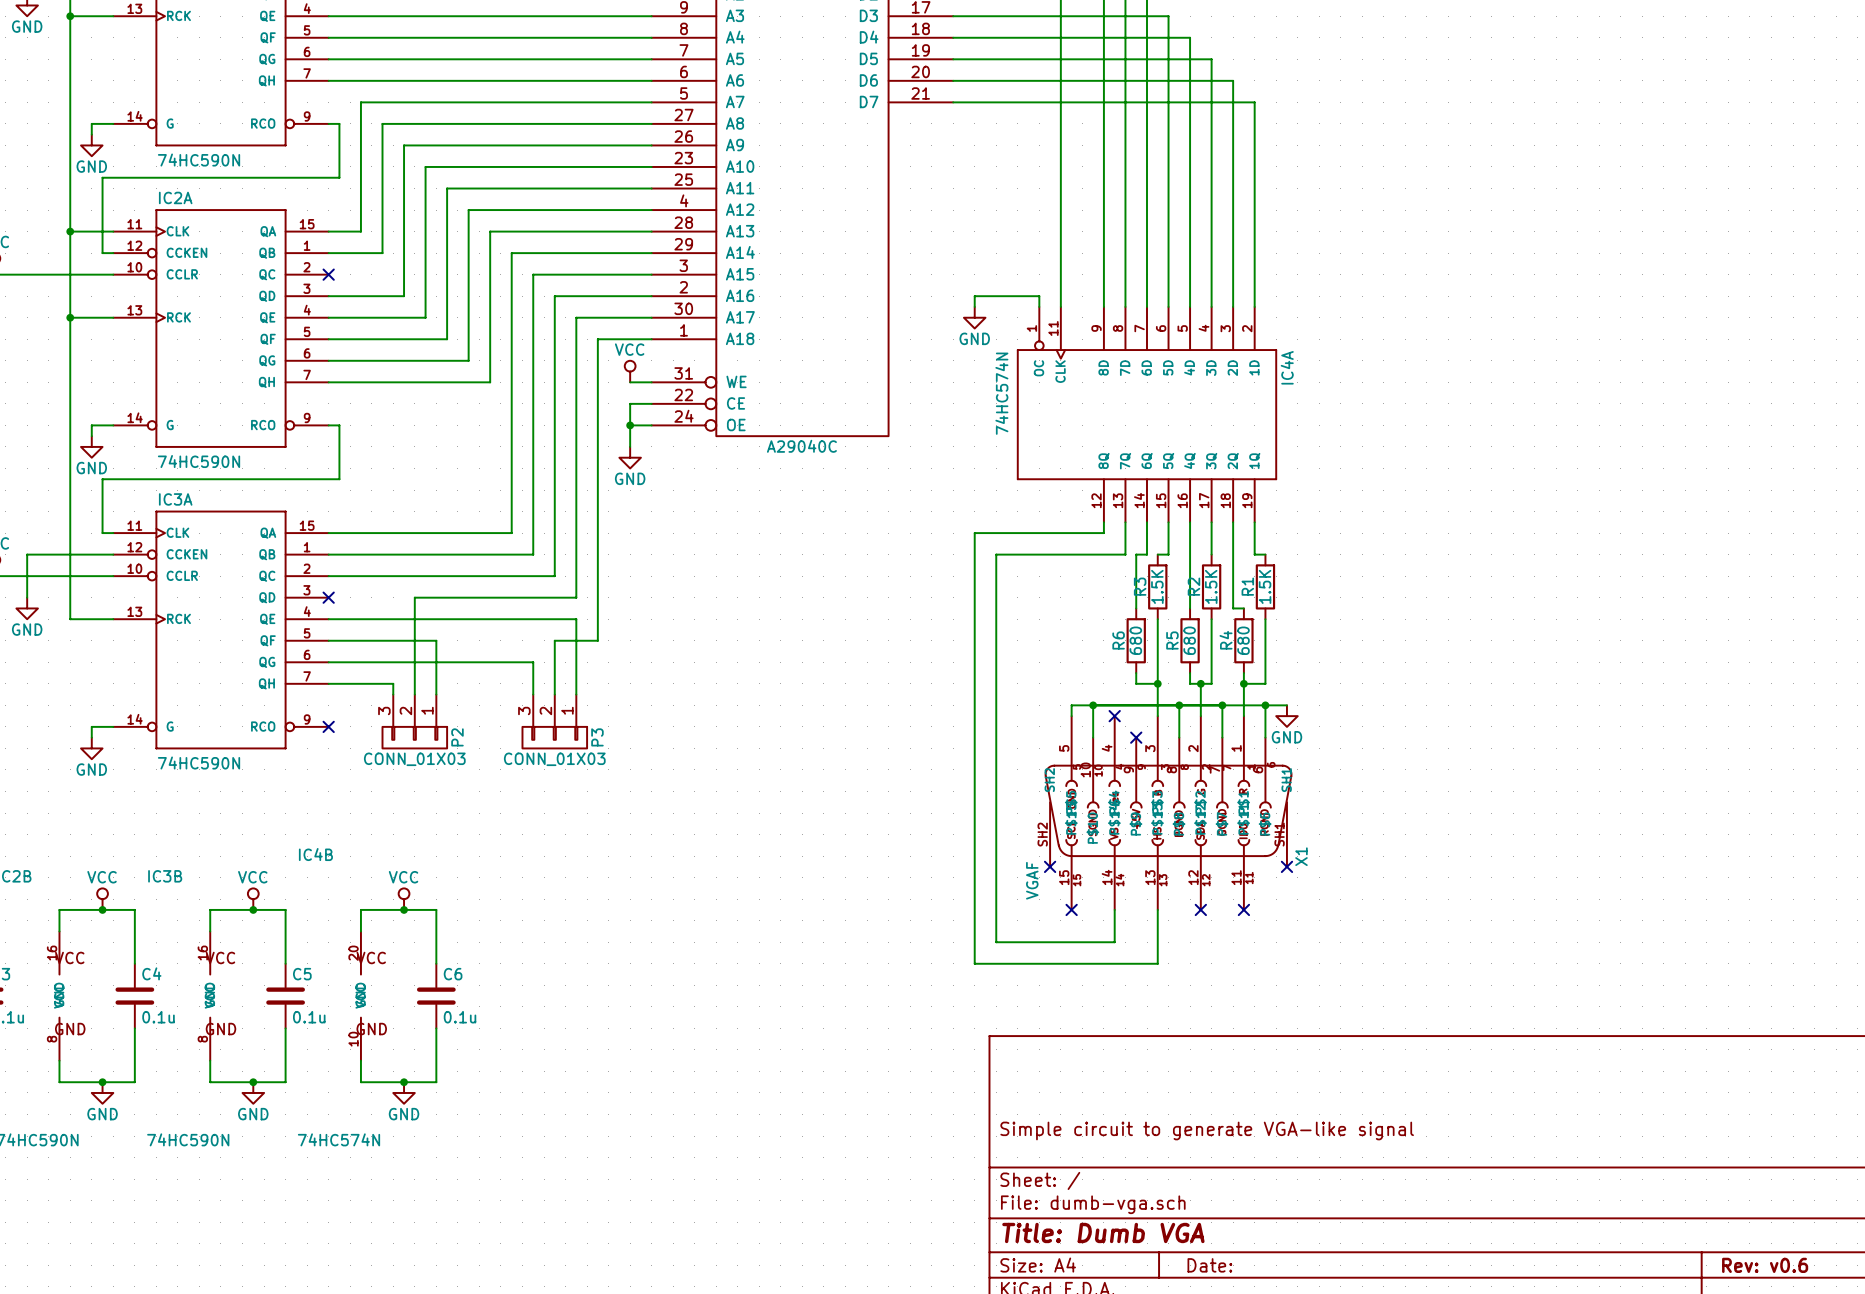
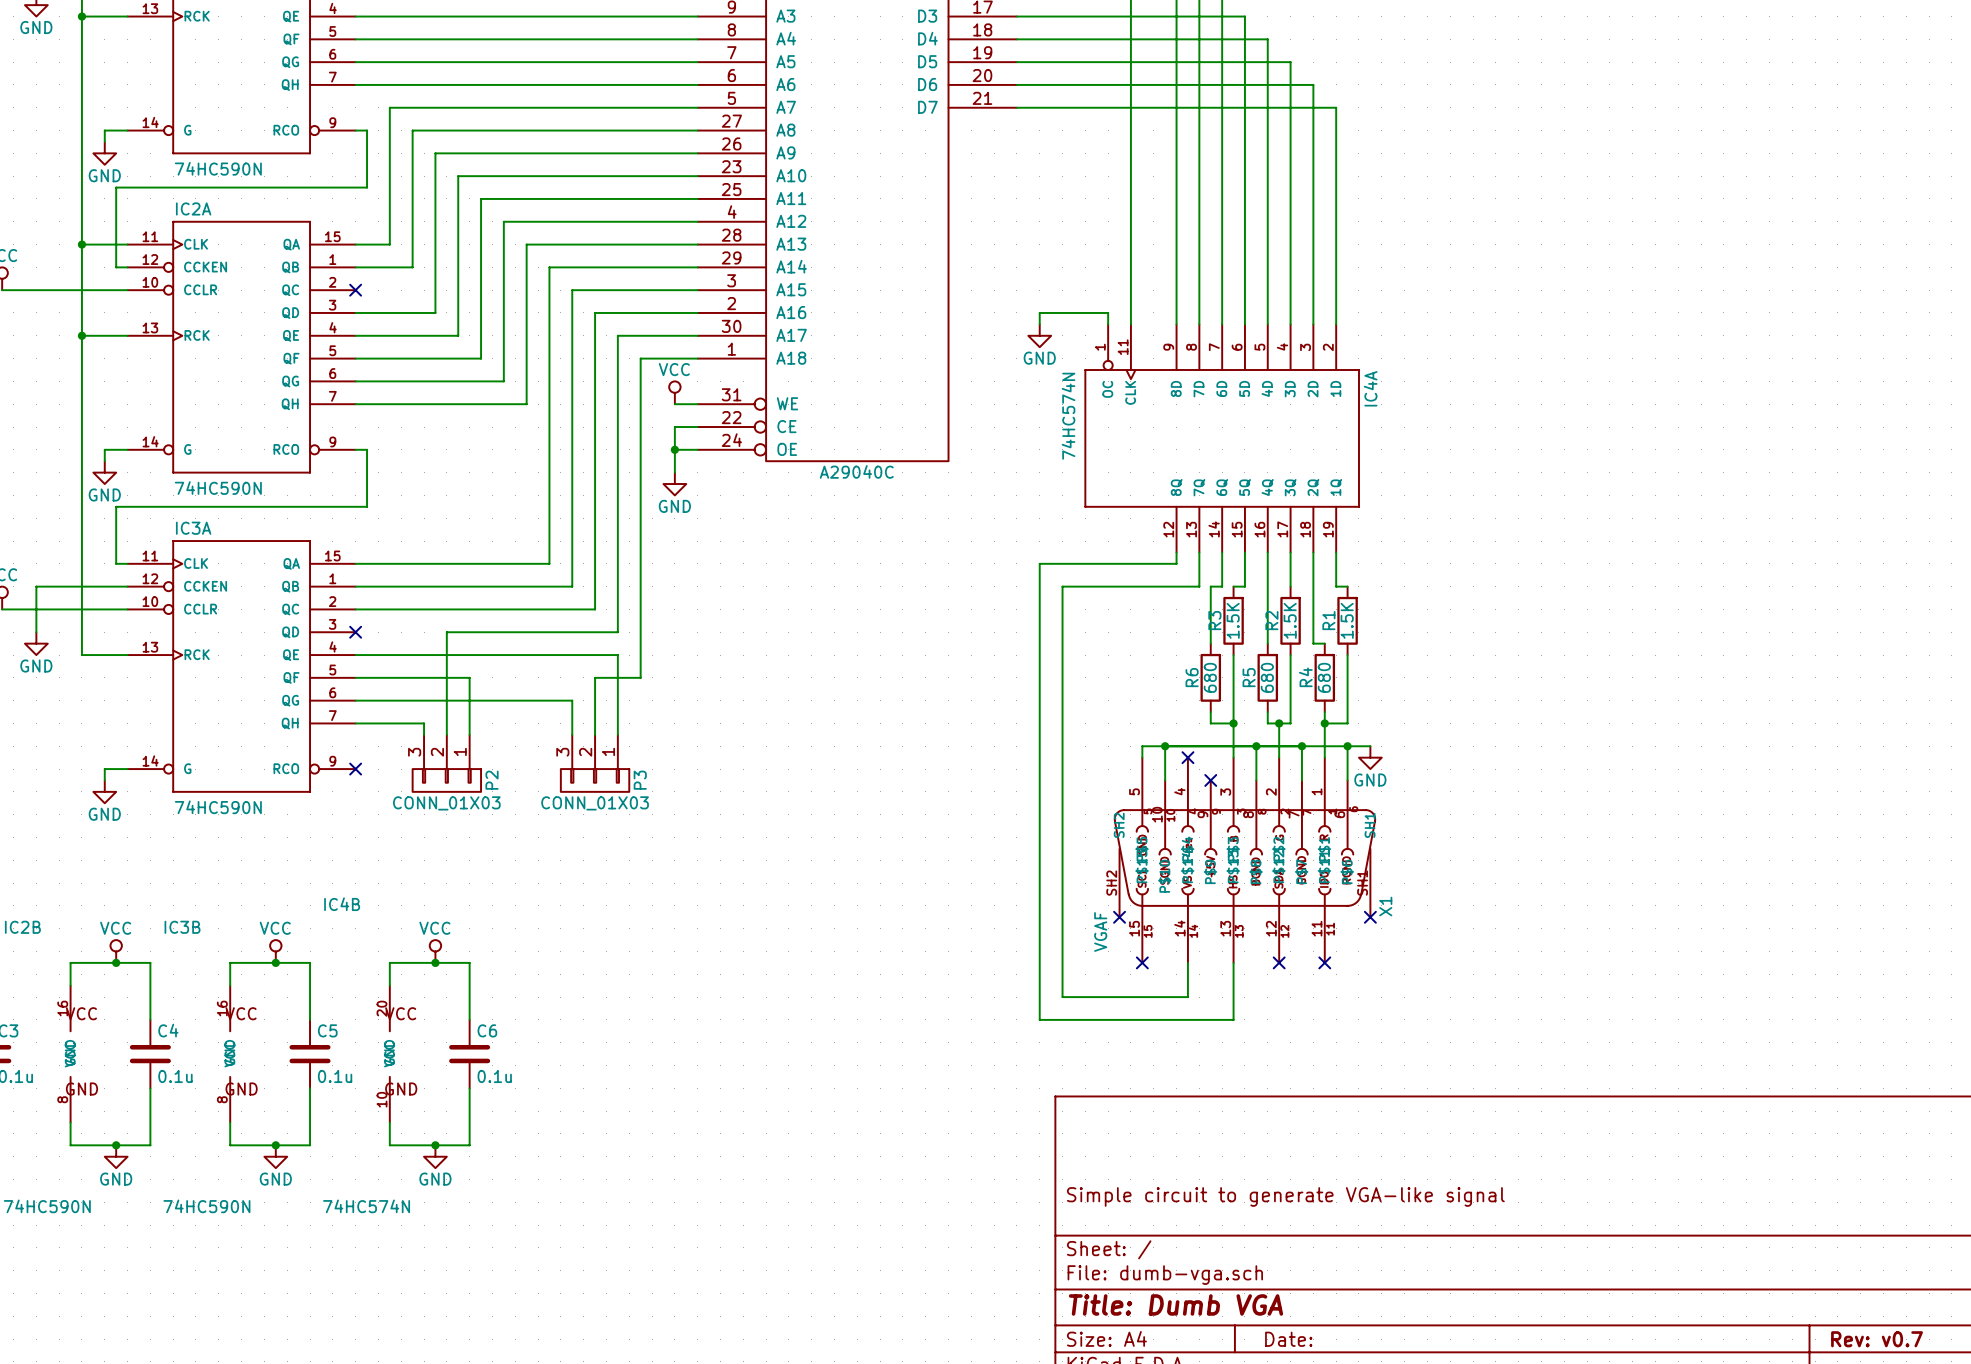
title block: Rev: v0.6 (1765, 1265) -> Rev: v0.7 (1877, 1339)

